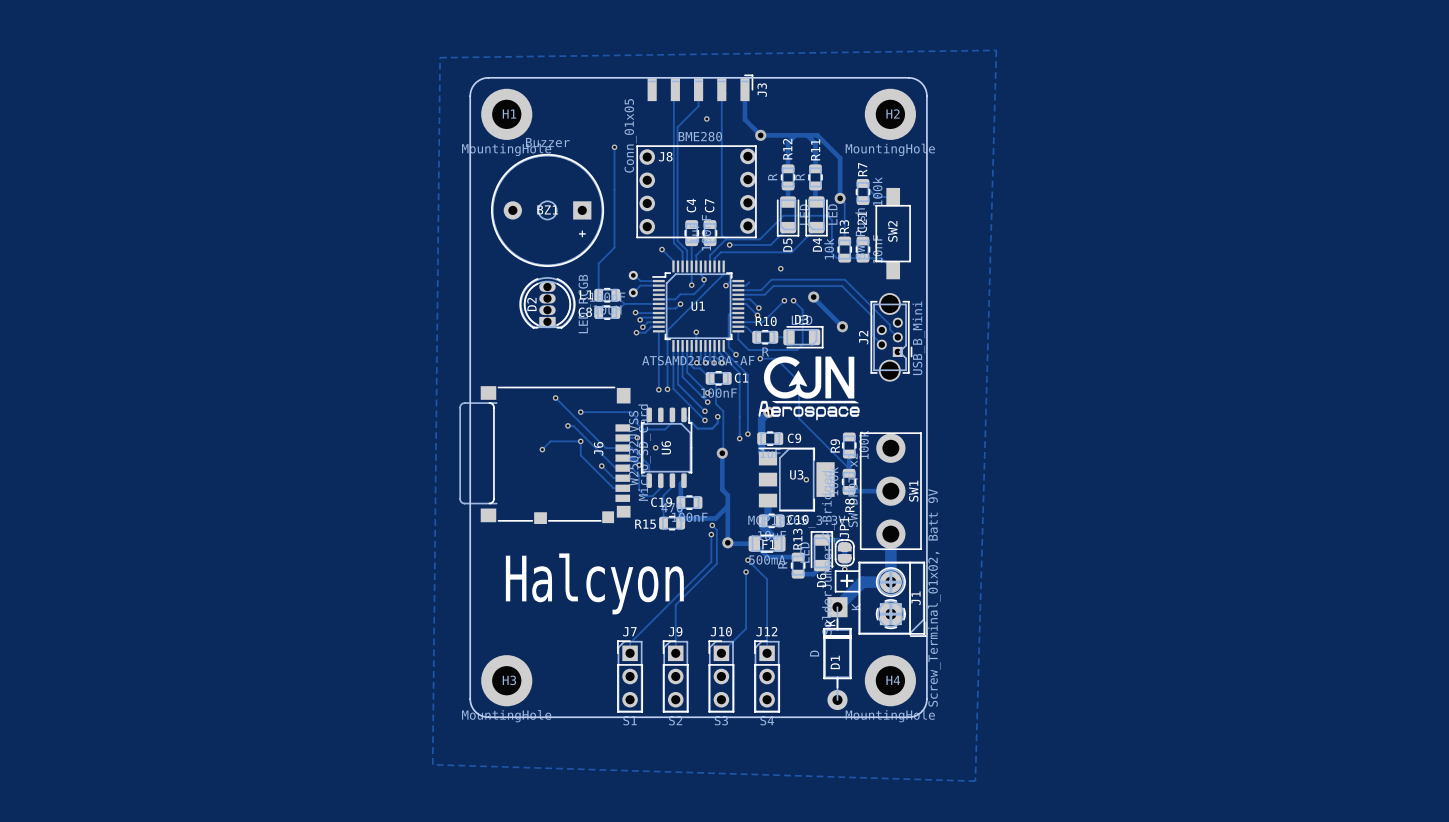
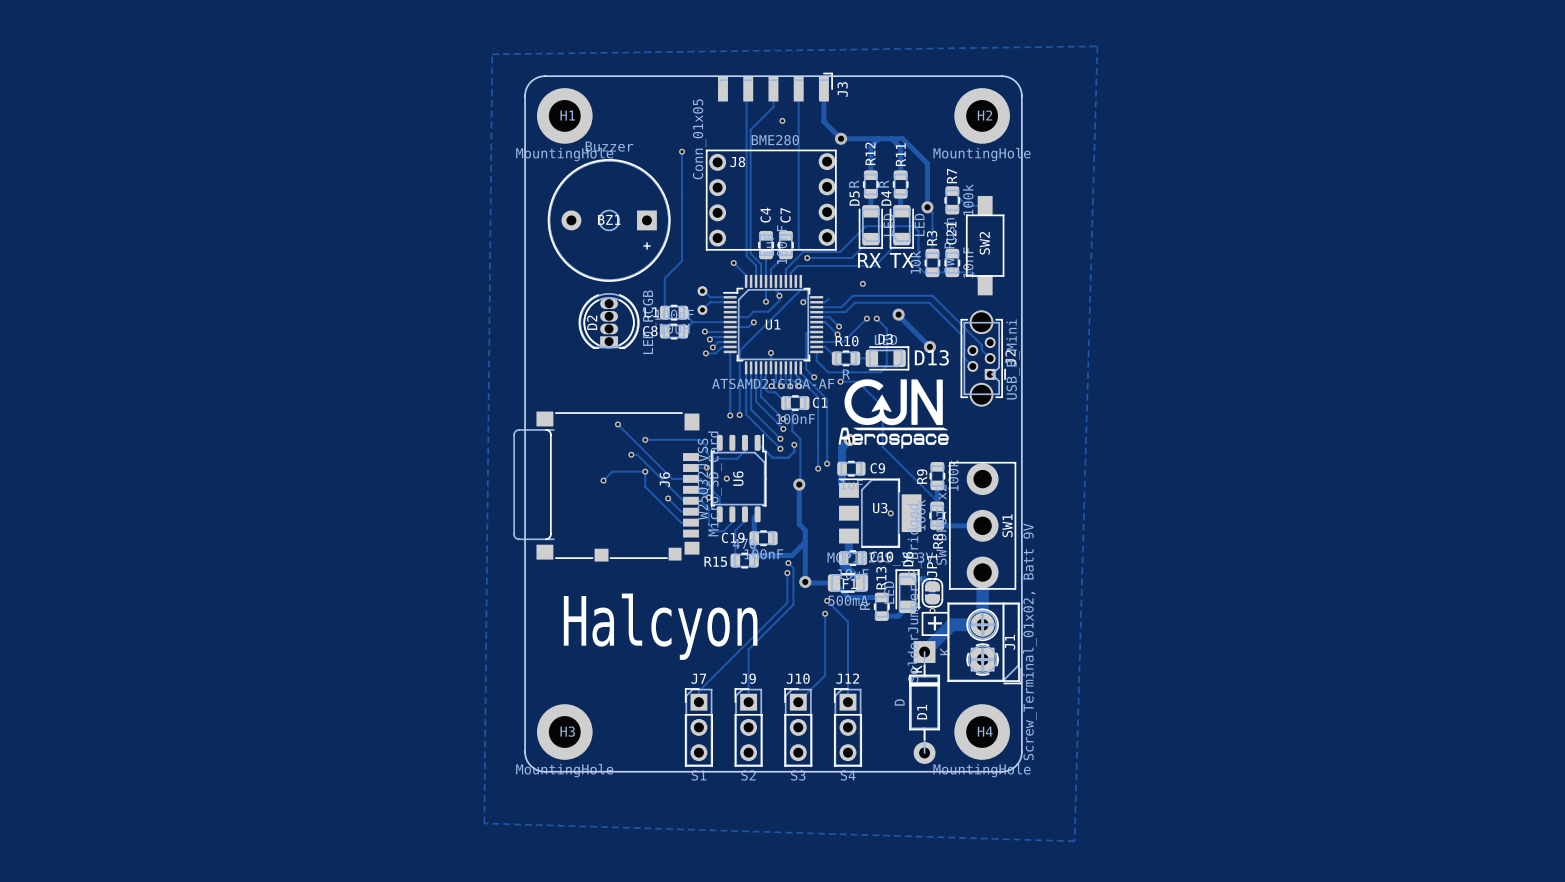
D4 name position: D4 (817, 244) -> D4 (886, 198)
D5 name position: D5 (787, 245) -> D5 (854, 198)
text: none -> RX (869, 260)
text: none -> TX (901, 260)
text: none -> D13 (931, 357)
J2 name position: J2 (863, 337) -> J2 (1010, 357)
D6 name position: D6 (821, 580) -> D6 (908, 559)

